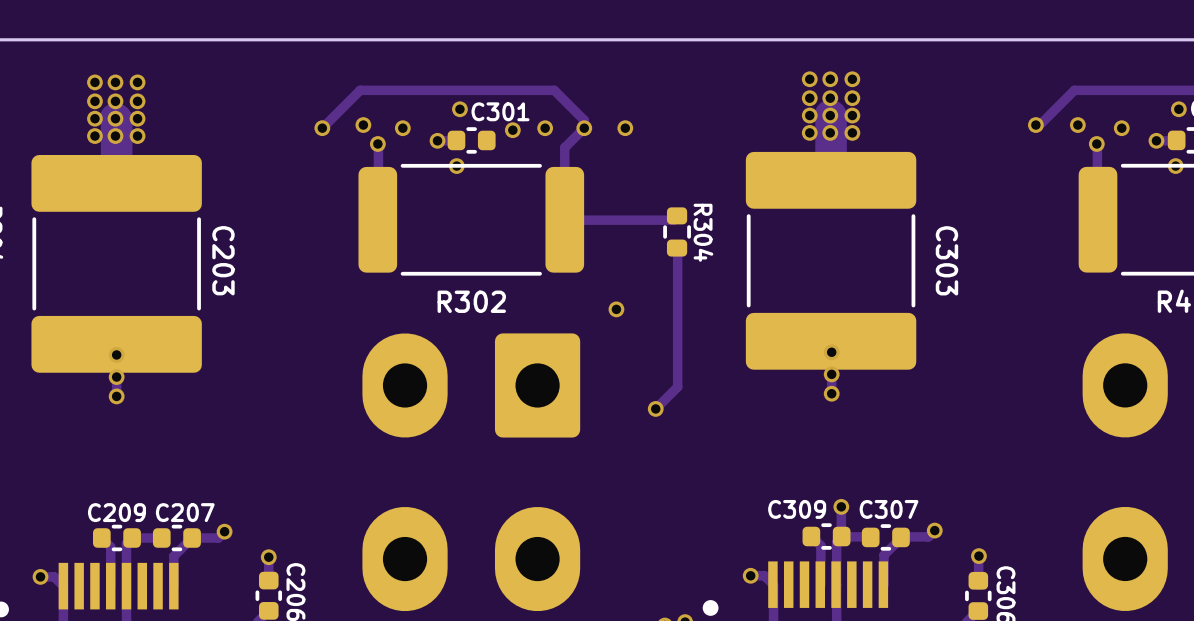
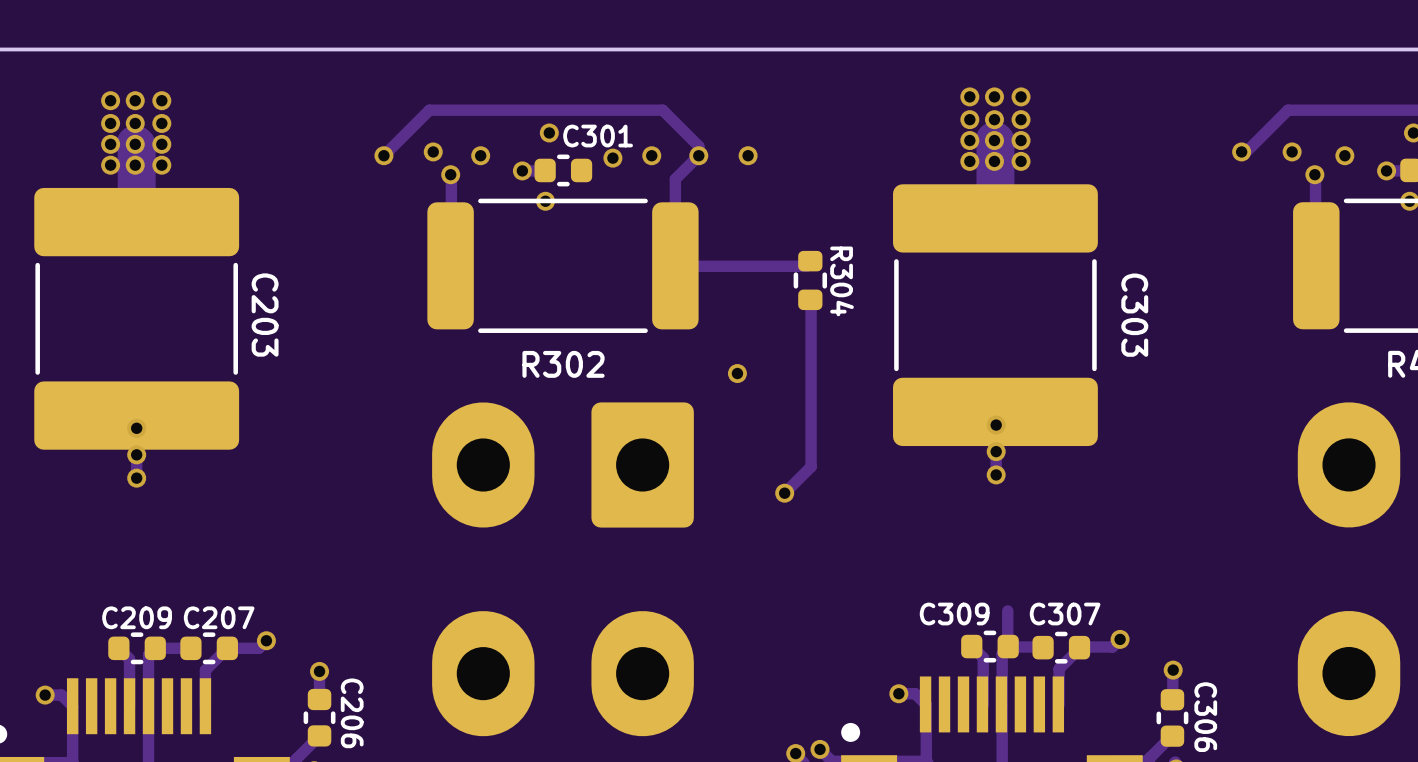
via: (841, 506) -> none

